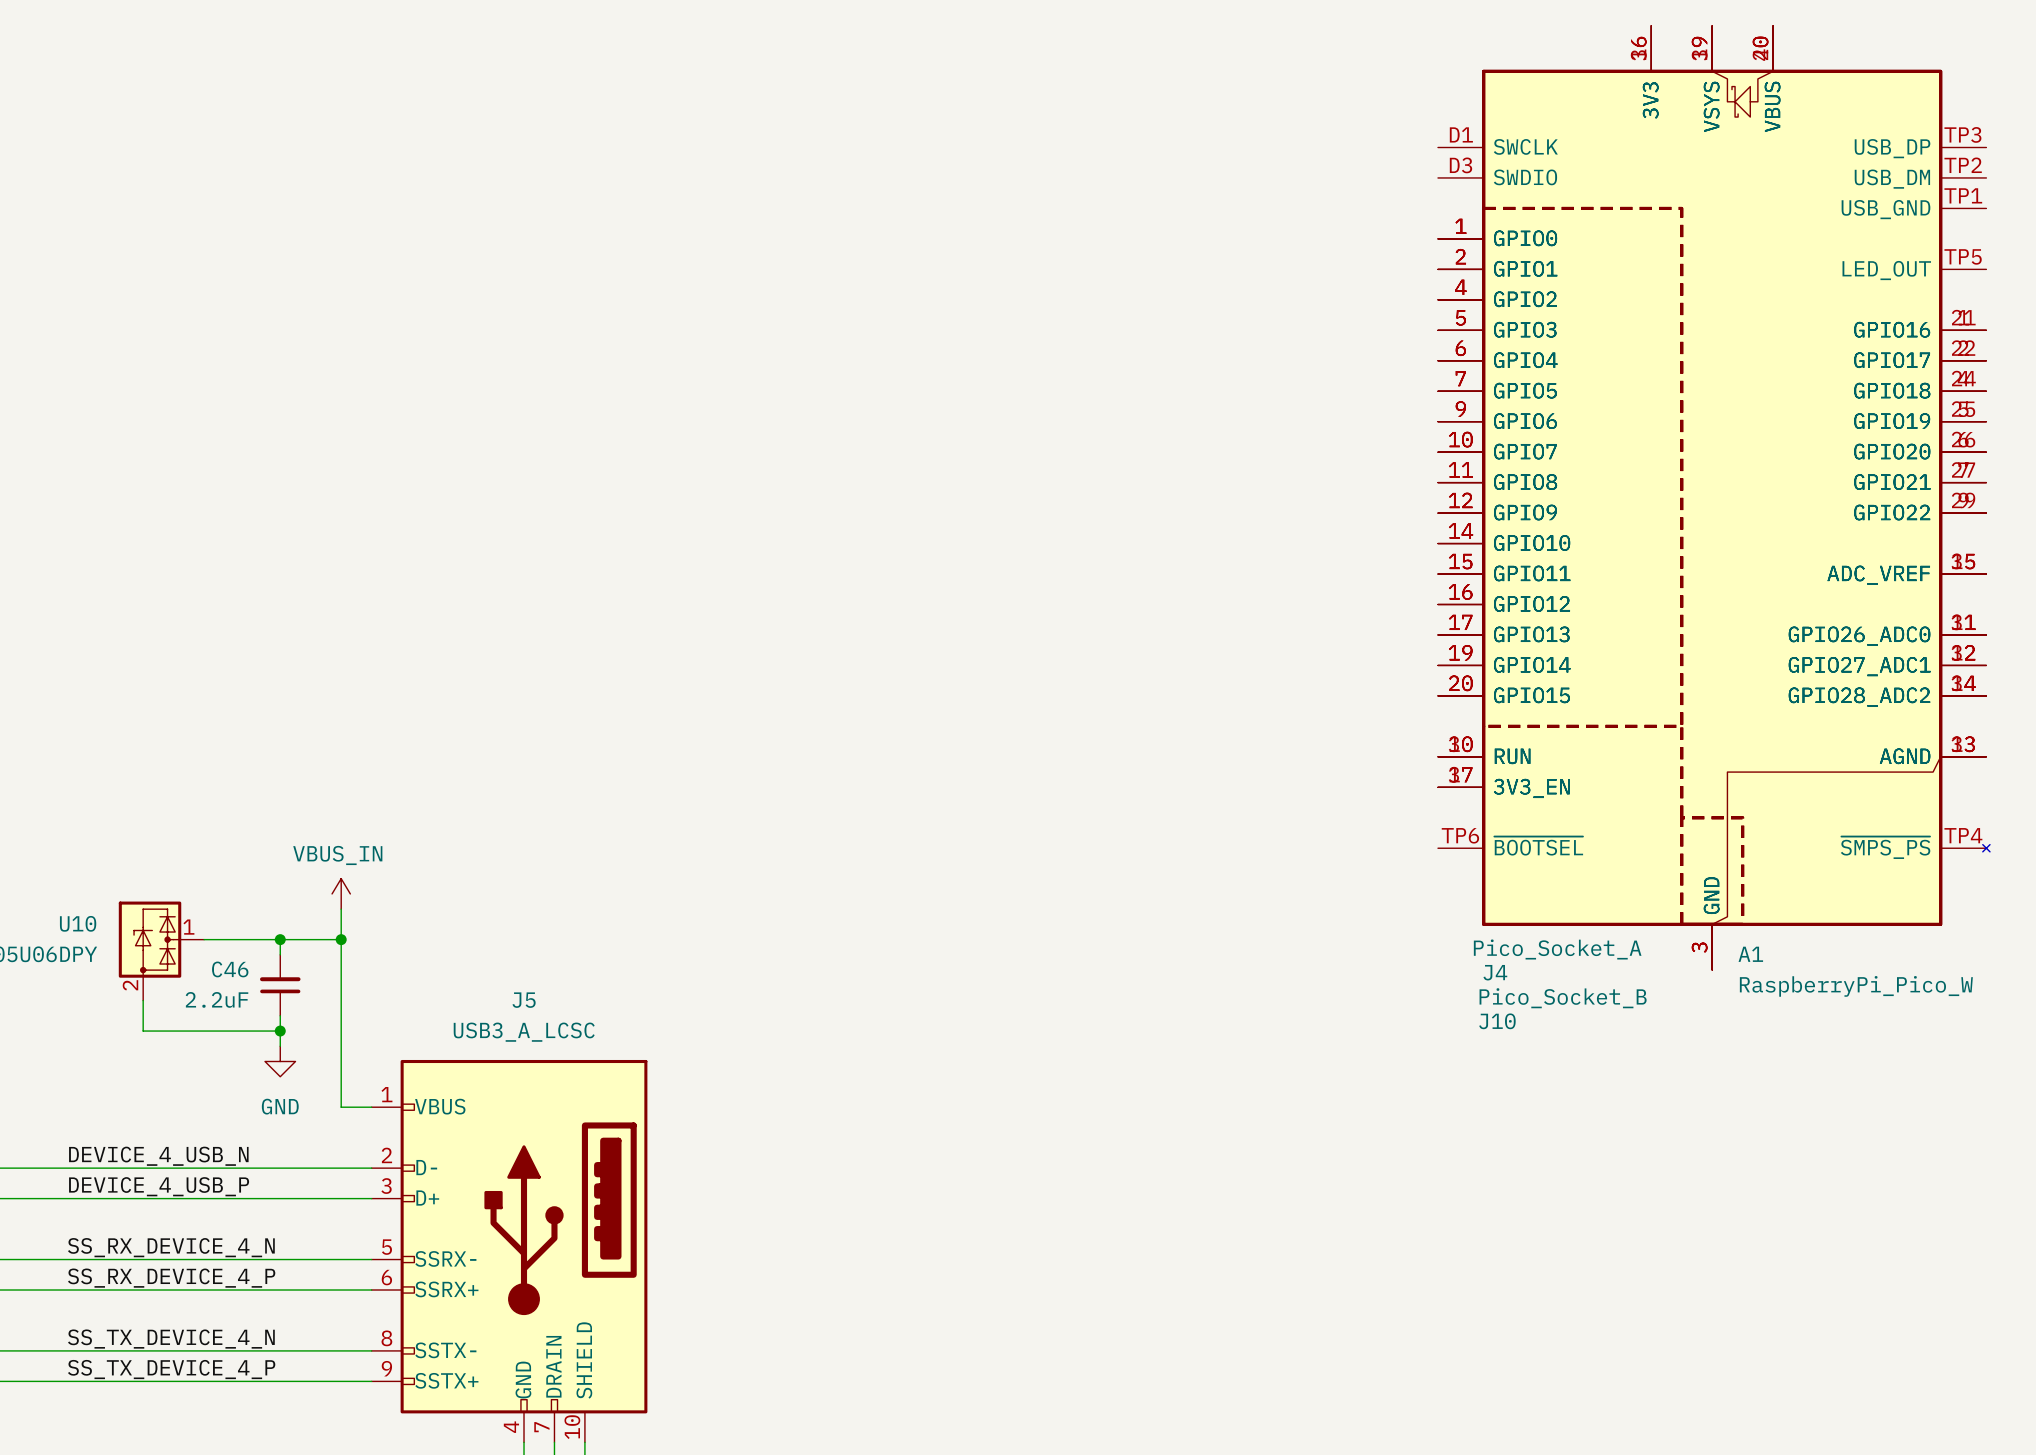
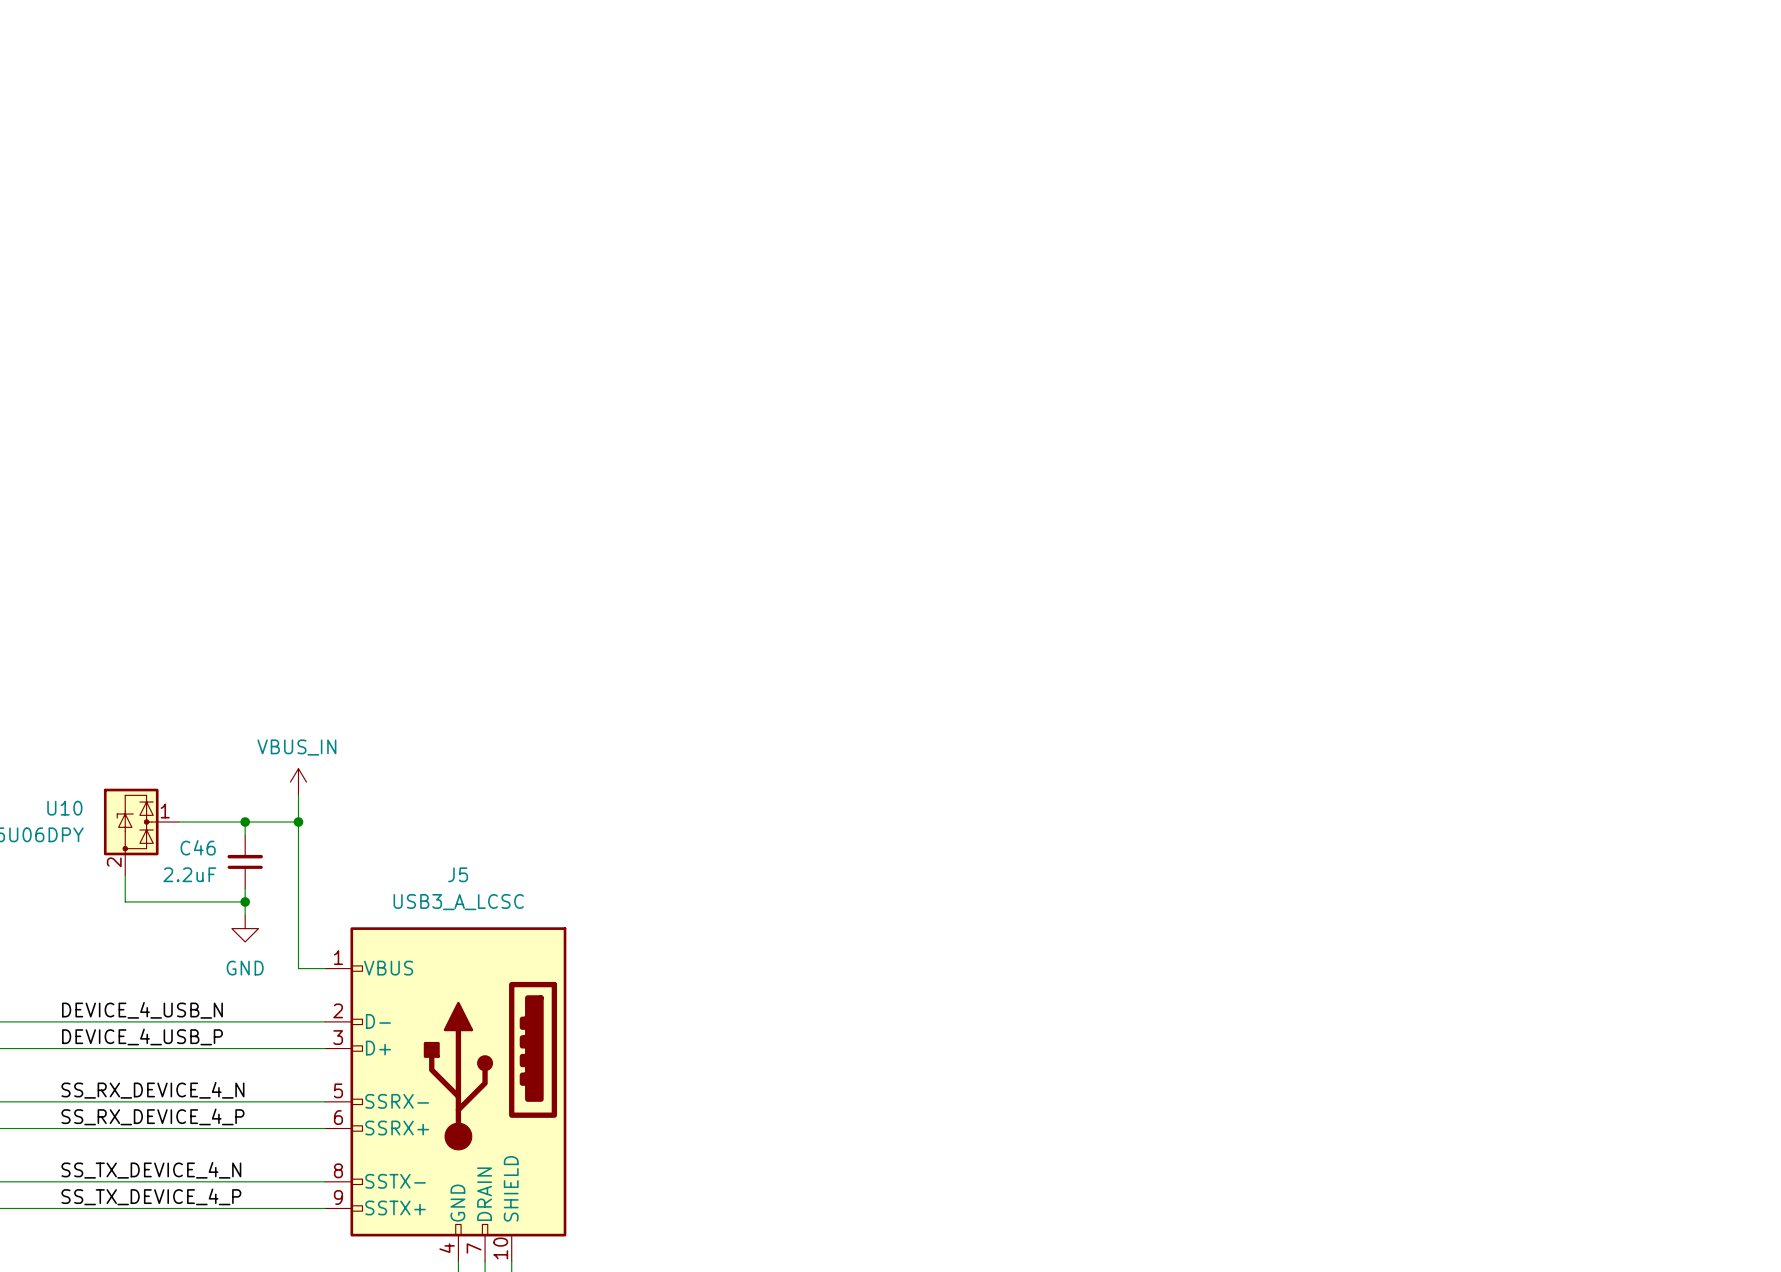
J10: Pico_Socket_B (1712, 475) -> none
A1: RaspberryPi_Pico_W (1713, 497) -> none
J4: Pico_Socket_A (1591, 588) -> none

